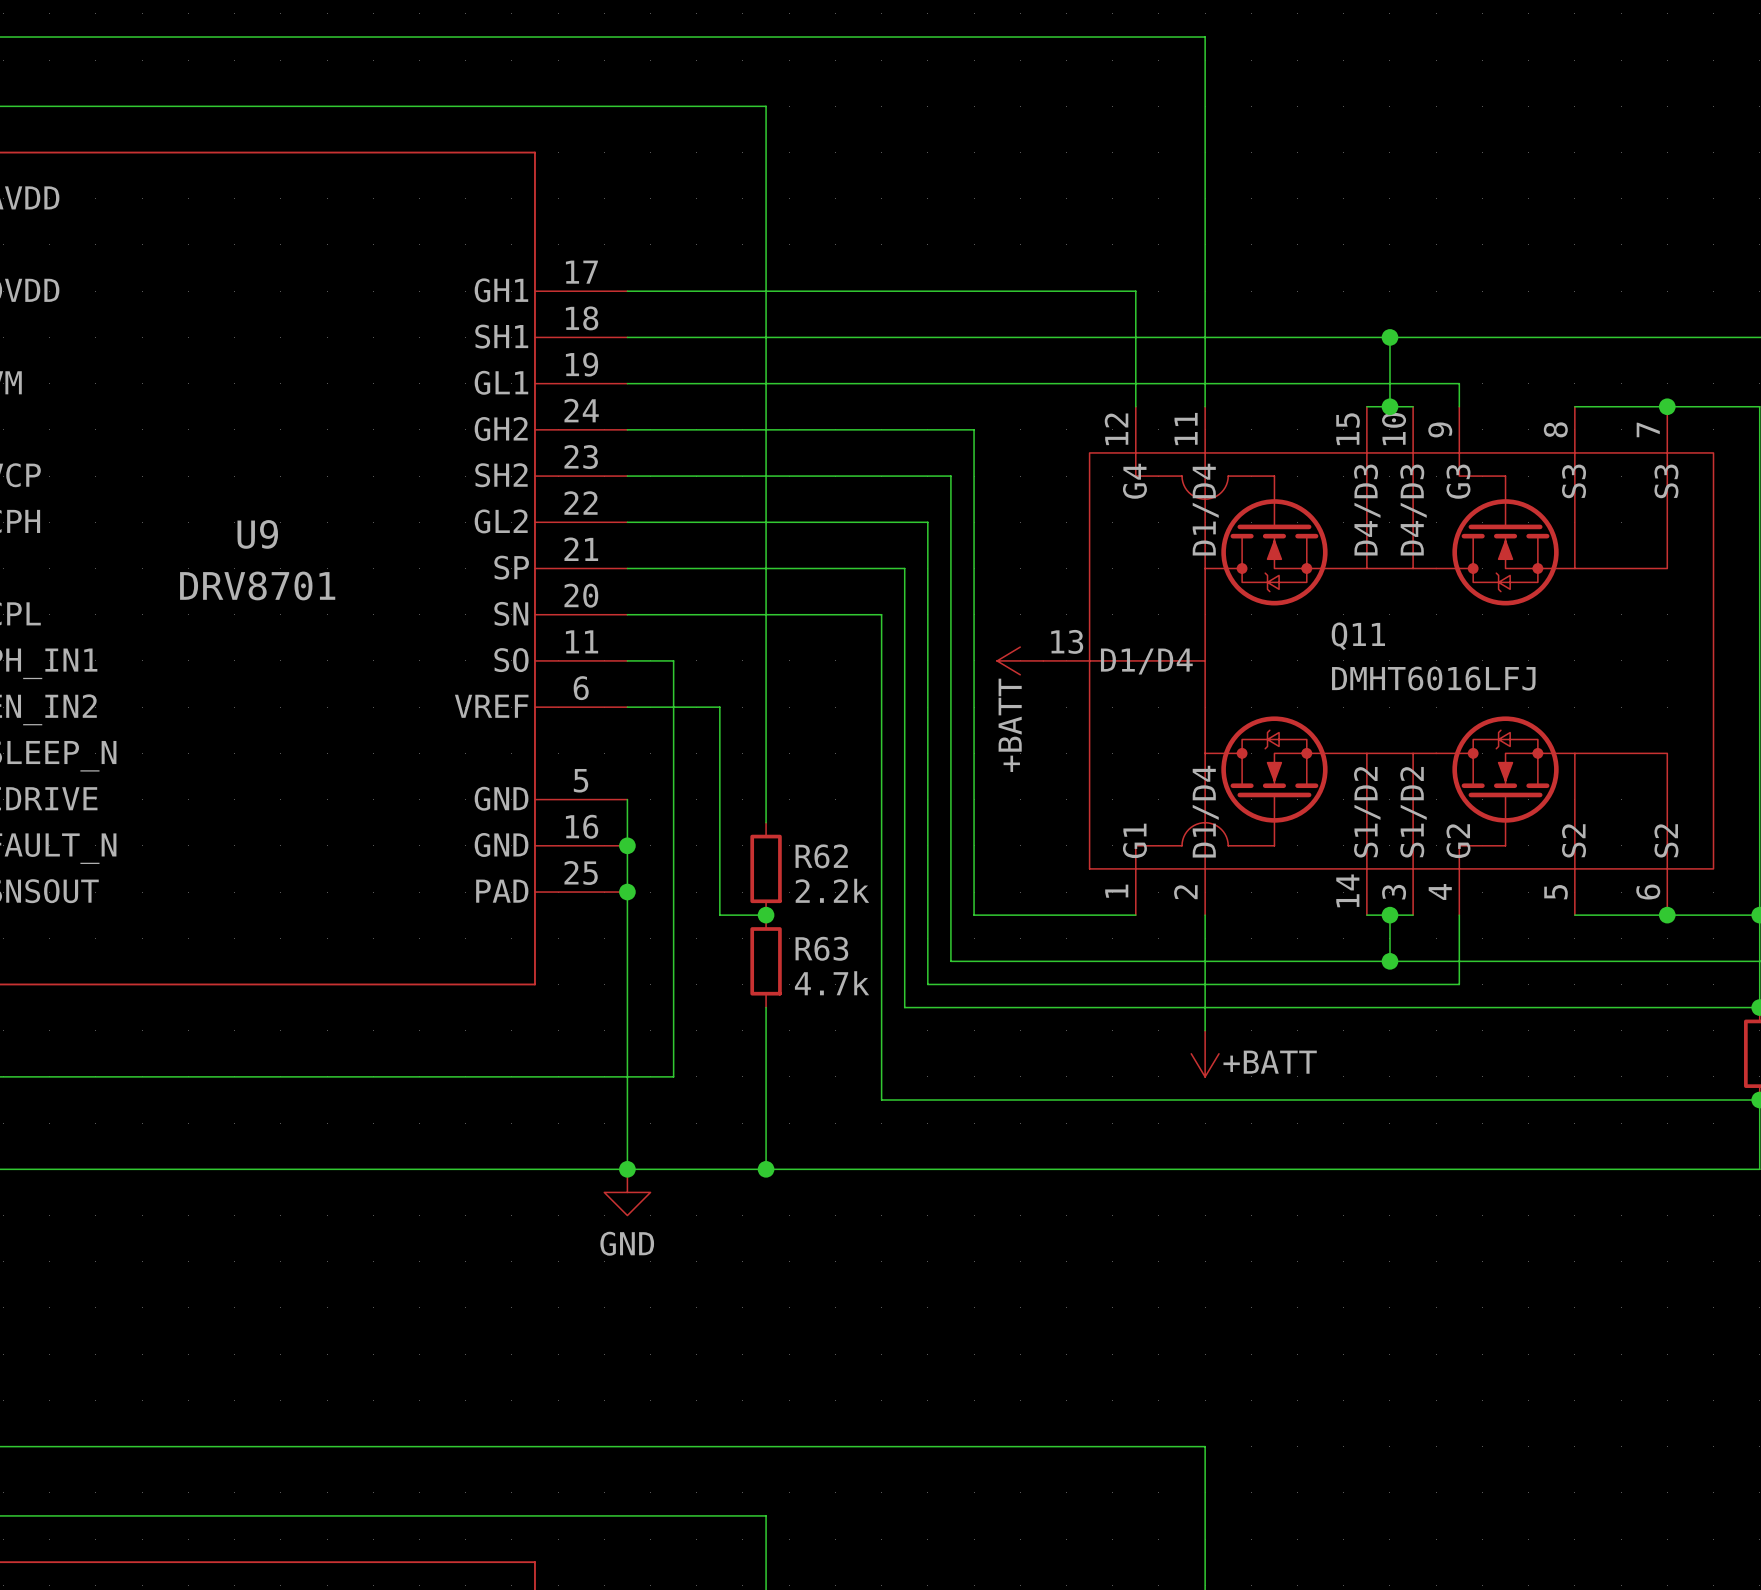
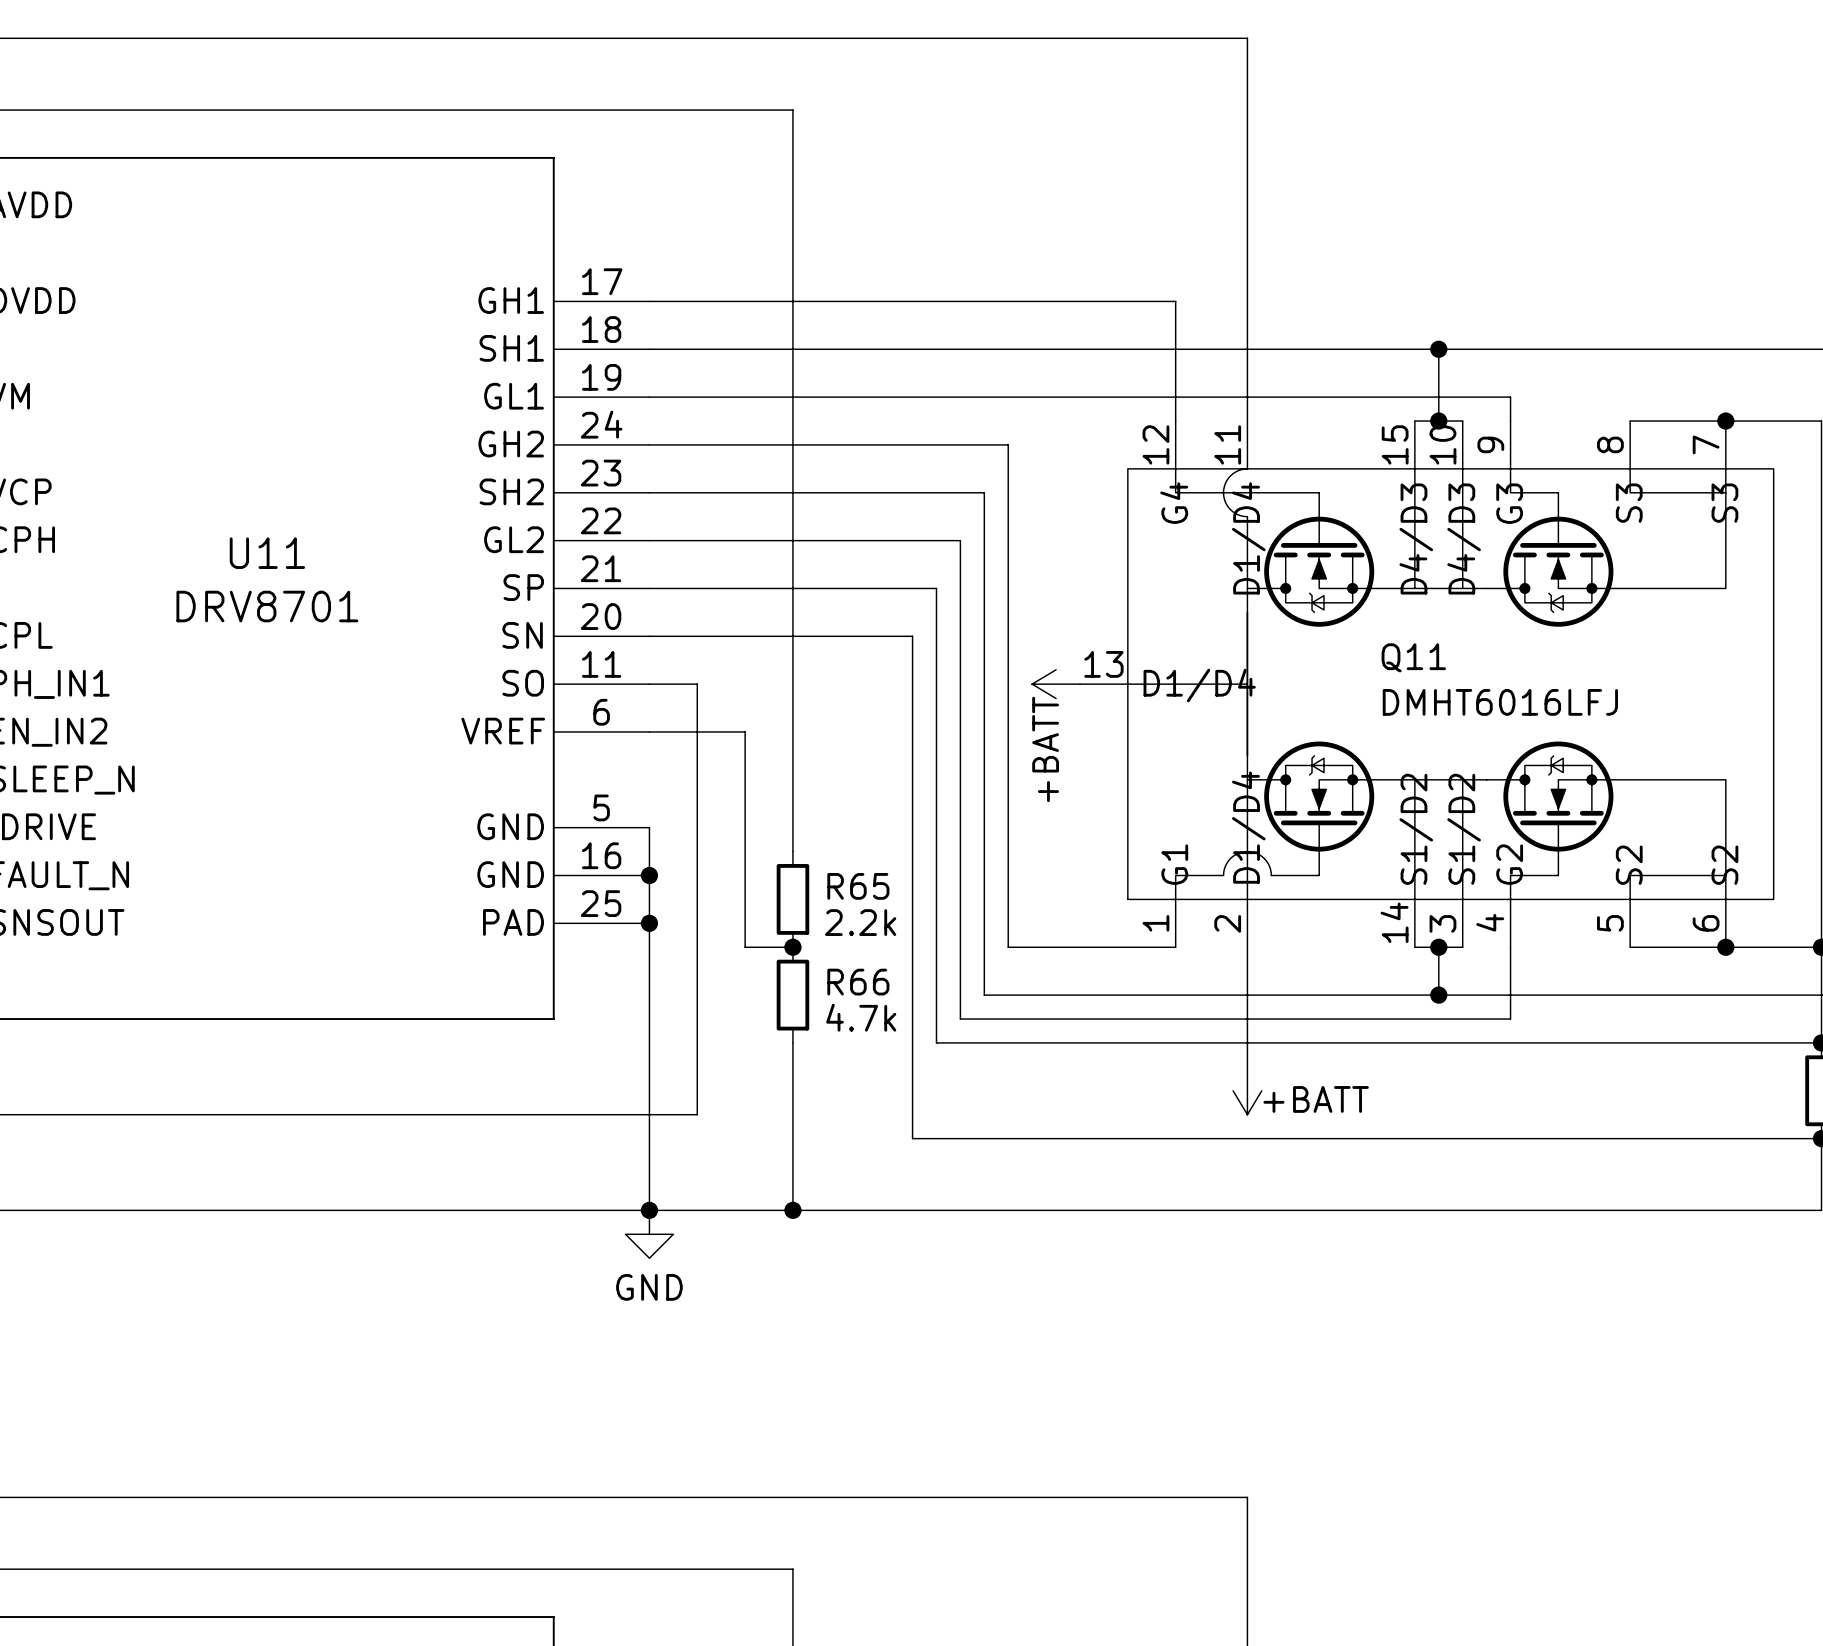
Q11 symbol: [1043, 406, 1714, 916] -> [1079, 421, 1774, 948]
U9 name: U9 (257, 534) -> U11 (267, 553)
R62 name: R62 (821, 856) -> R65 (858, 886)
R63 name: R63 (821, 948) -> R66 (858, 982)

